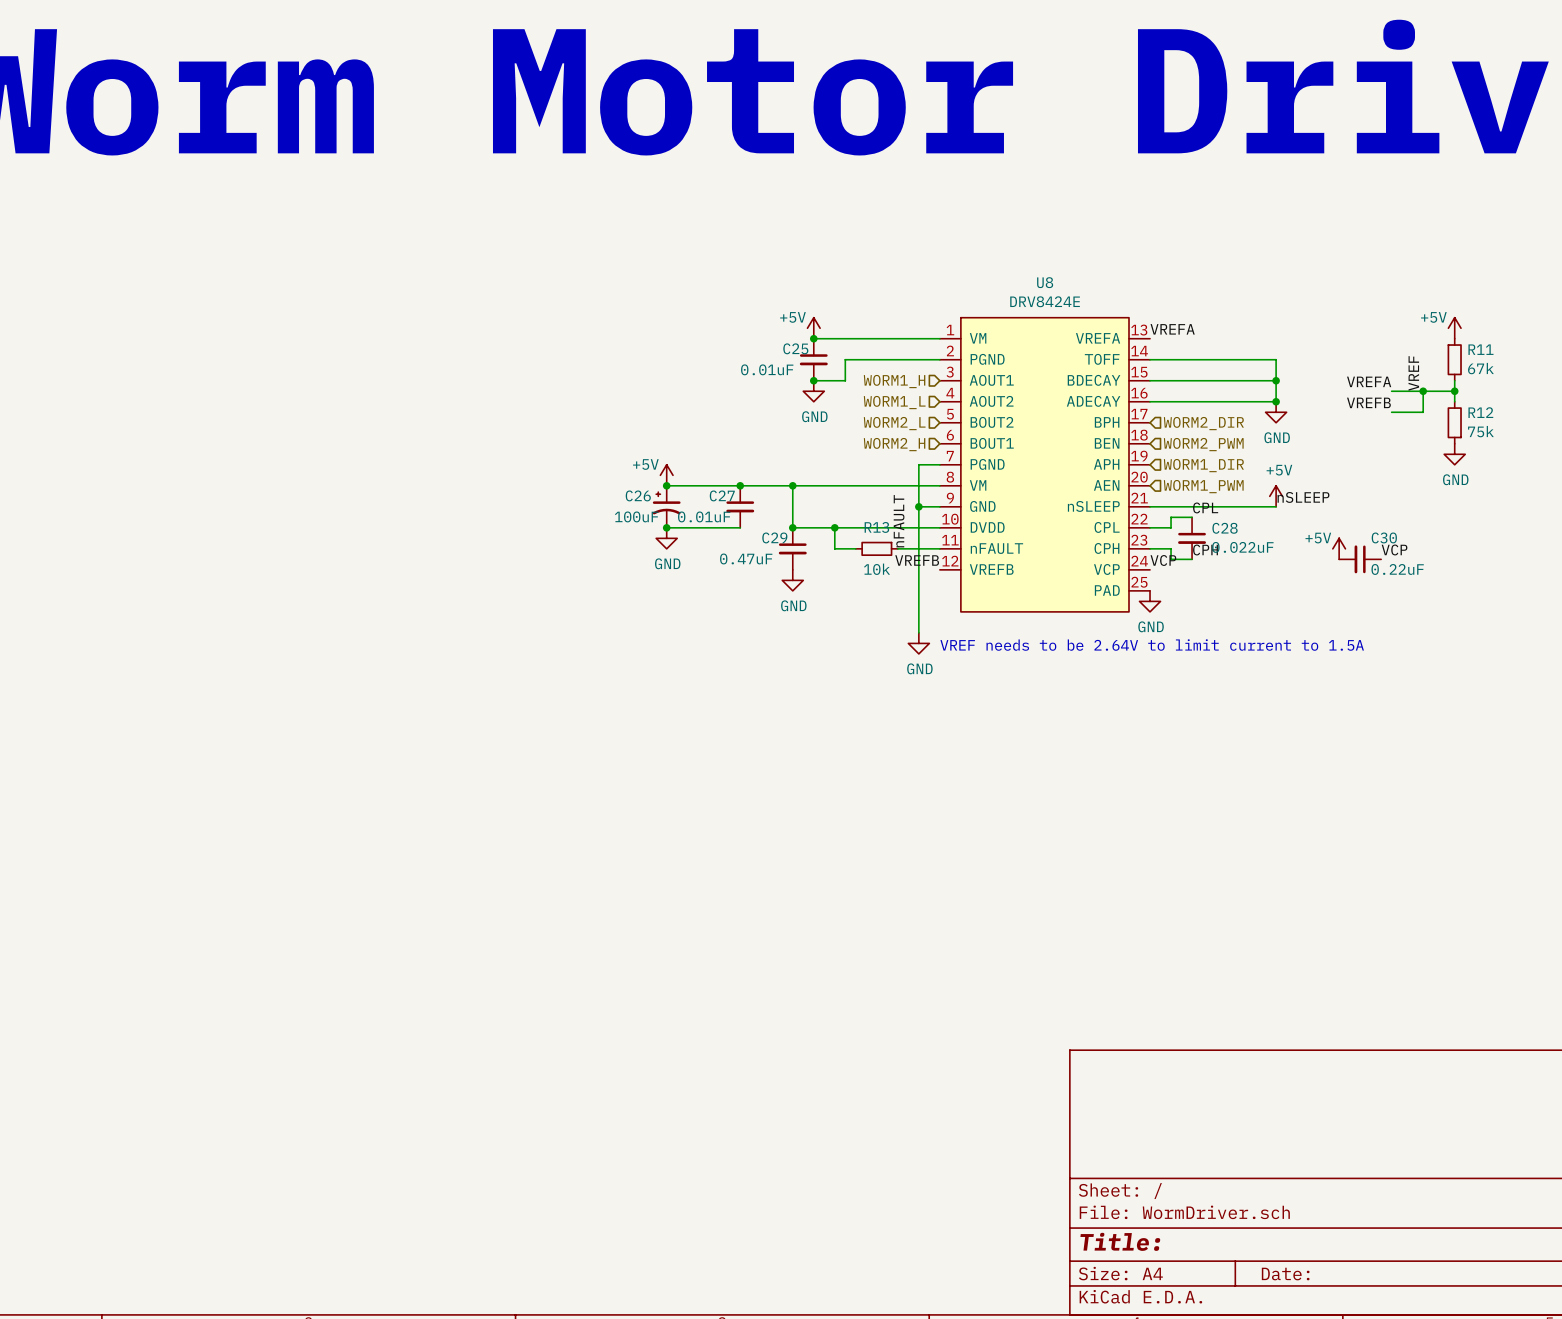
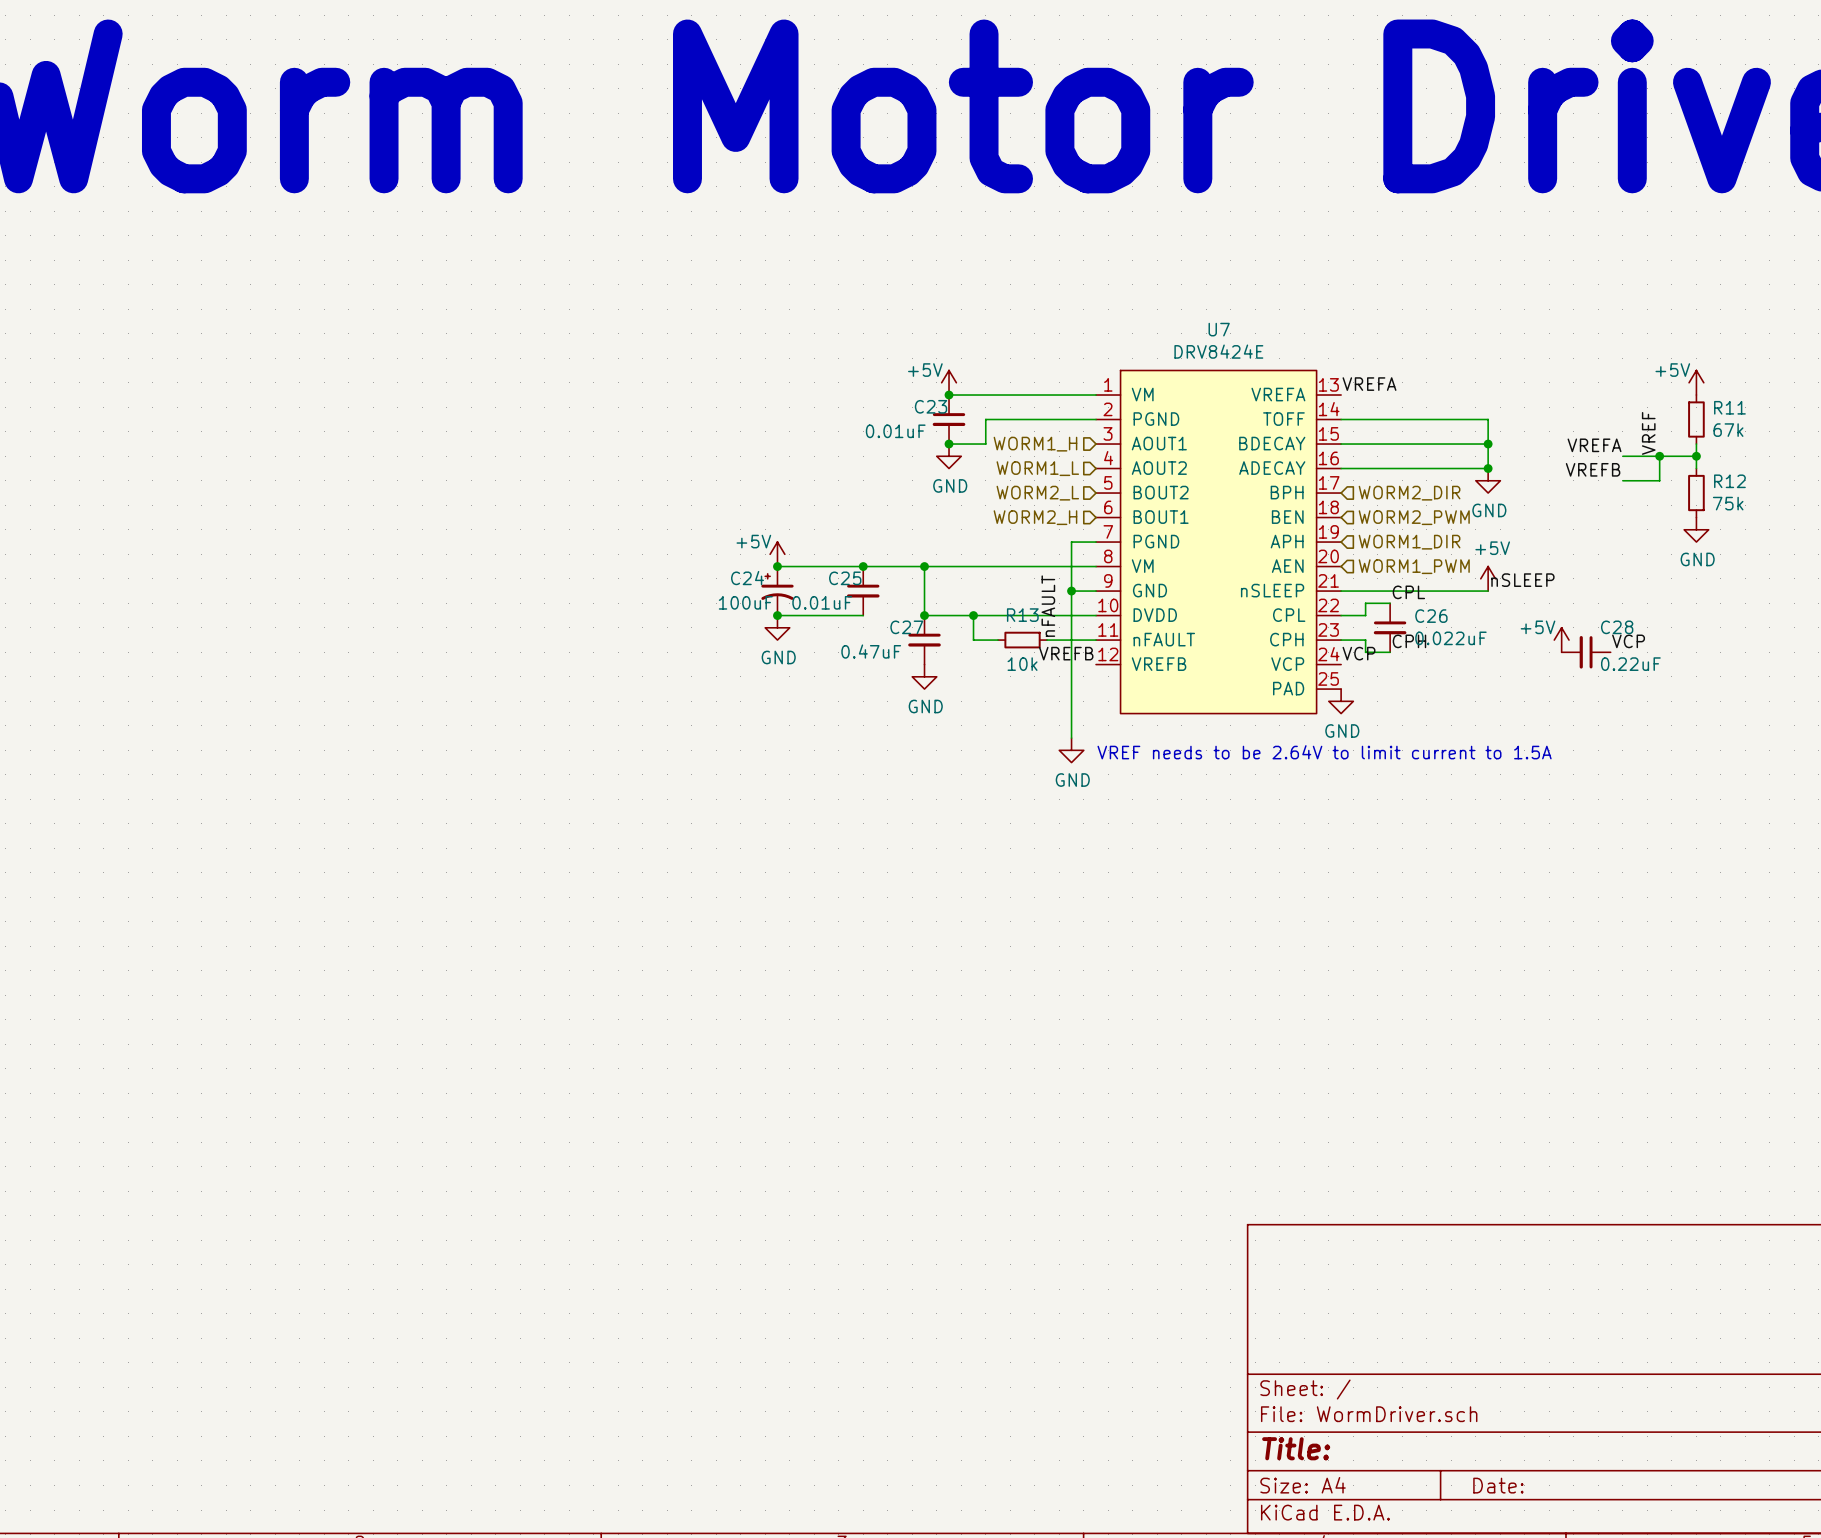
U8 name: U8 (1045, 282) -> U7 (1219, 329)
C25 name: C25 (795, 348) -> C23 (931, 406)
C26 name: C26 (638, 495) -> C24 (747, 578)
C27 name: C27 (722, 495) -> C25 (845, 578)
C28 name: C28 (1225, 528) -> C26 (1431, 616)
C29 name: C29 (774, 537) -> C27 (906, 627)
C30 name: C30 (1384, 537) -> C28 (1617, 627)

